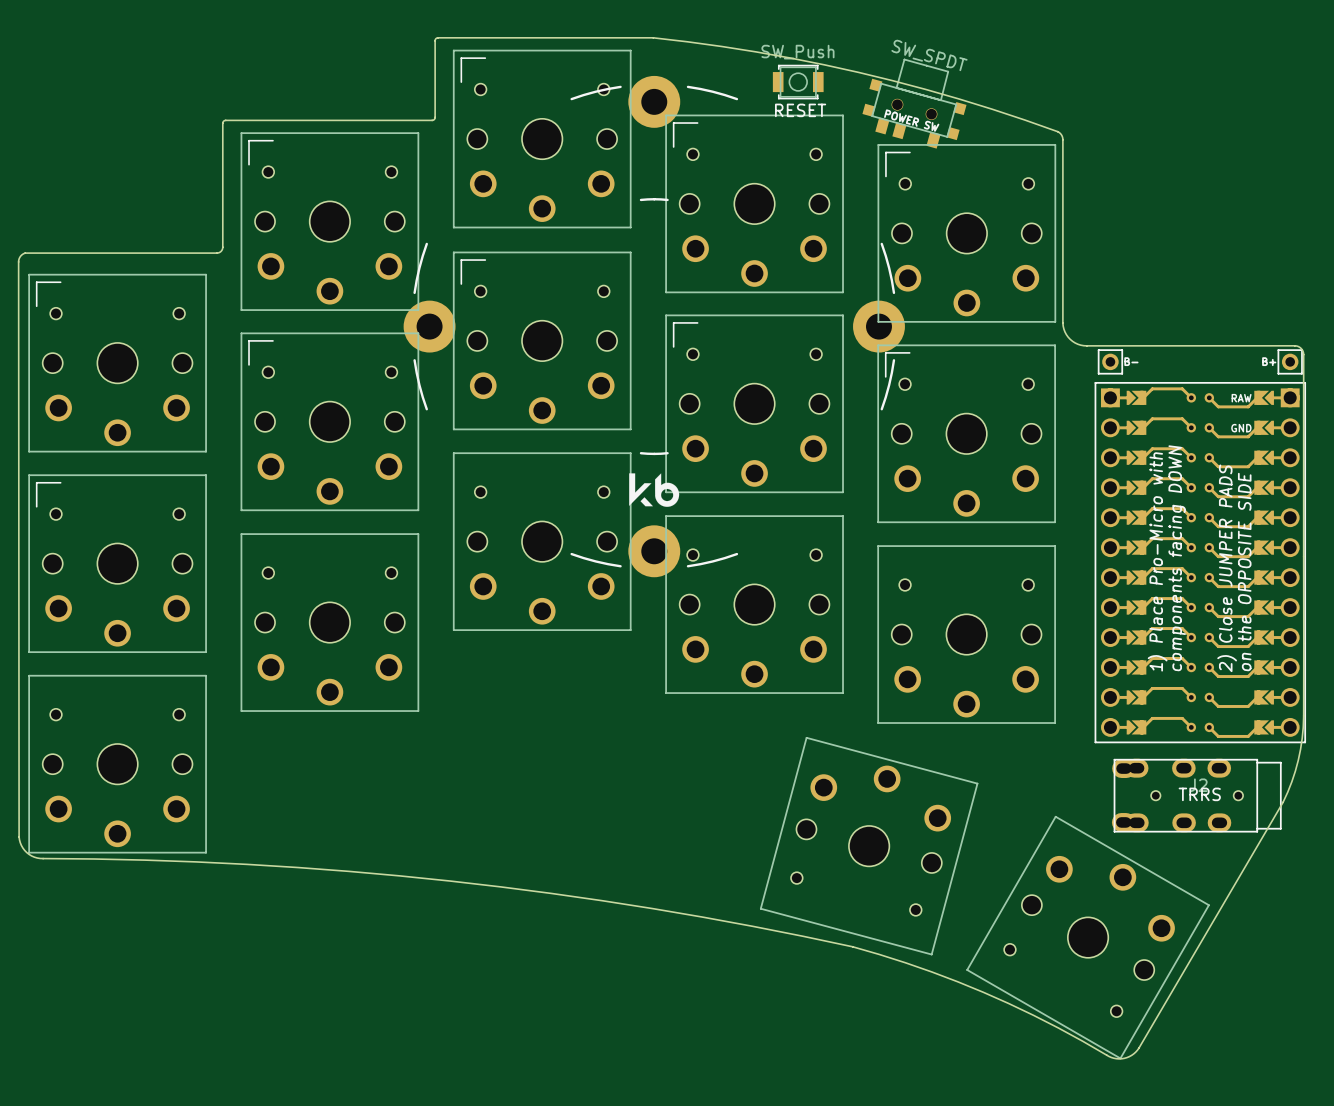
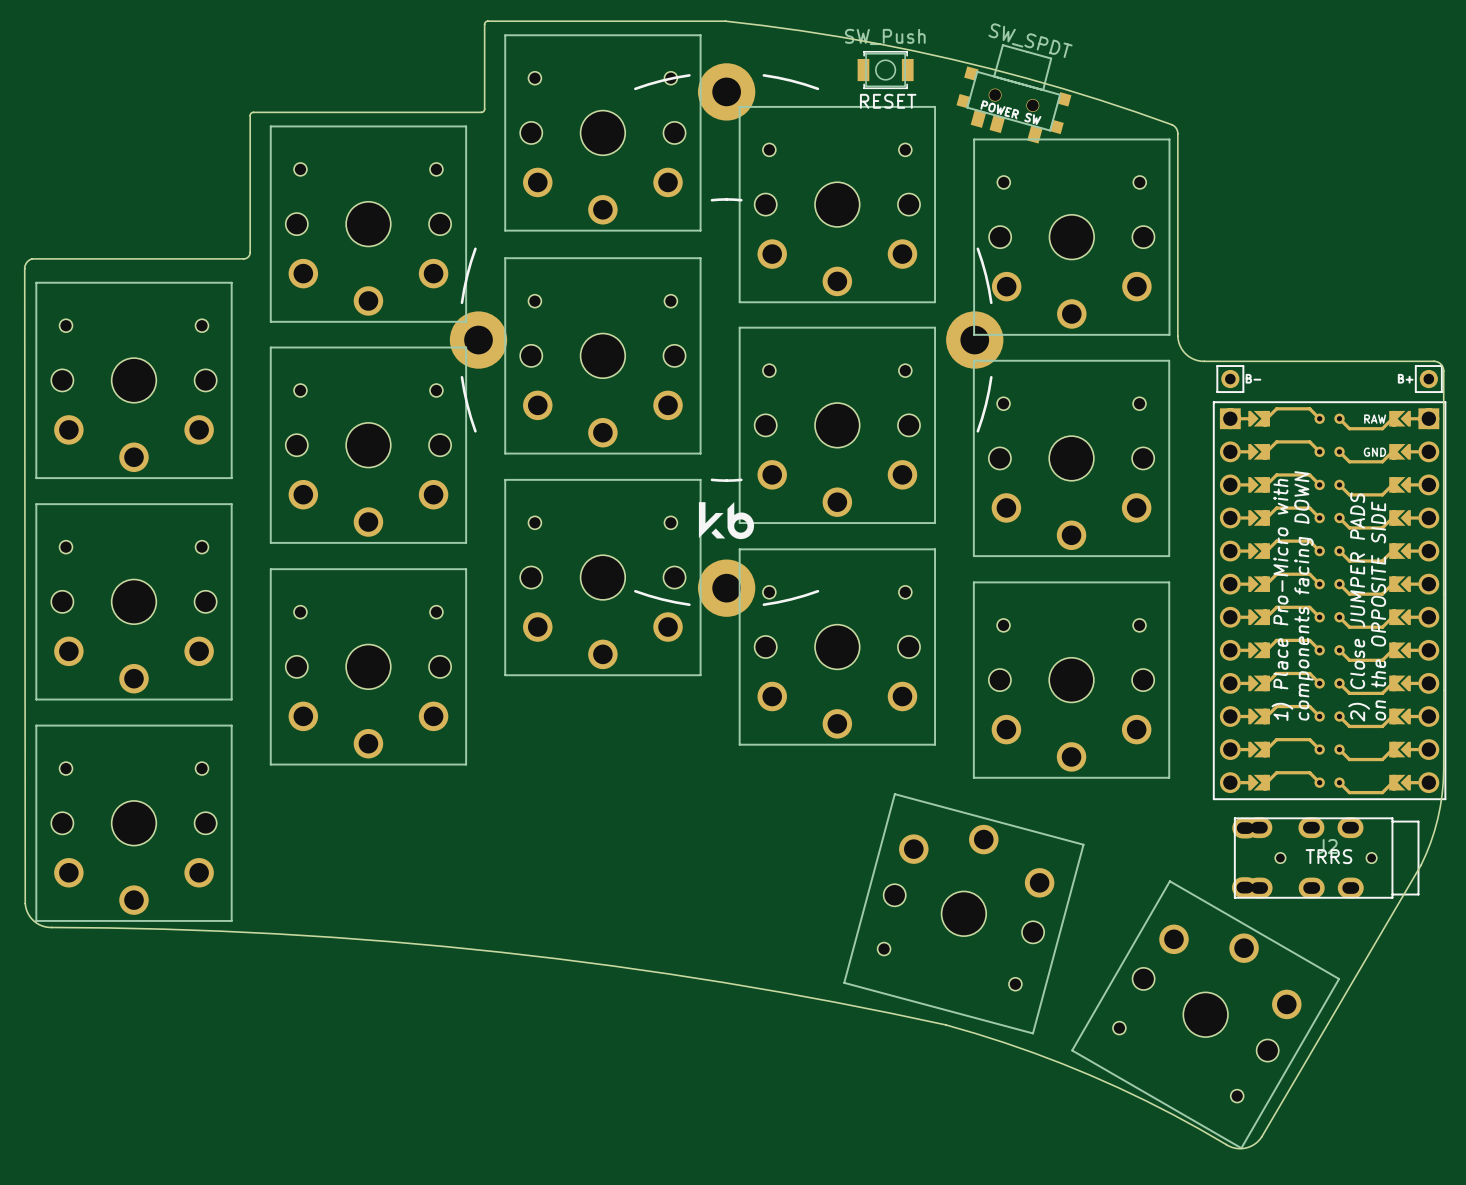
part footprint: [452, 49, 632, 229] -> [504, 34, 702, 232]
part footprint: [665, 114, 844, 294] -> [738, 105, 937, 304]
part footprint: [240, 132, 420, 311] -> [269, 125, 468, 323]
part footprint: [877, 144, 1057, 323] -> [973, 138, 1171, 336]
part footprint: [452, 251, 632, 431] -> [504, 257, 702, 455]
part footprint: [28, 273, 207, 453] -> [35, 281, 233, 480]
part footprint: [665, 314, 844, 494] -> [738, 326, 937, 525]
part footprint: [240, 332, 420, 512] -> [269, 346, 468, 544]
part footprint: [877, 344, 1056, 524] -> [972, 359, 1171, 558]
part footprint: [28, 474, 207, 654] -> [35, 503, 233, 701]

